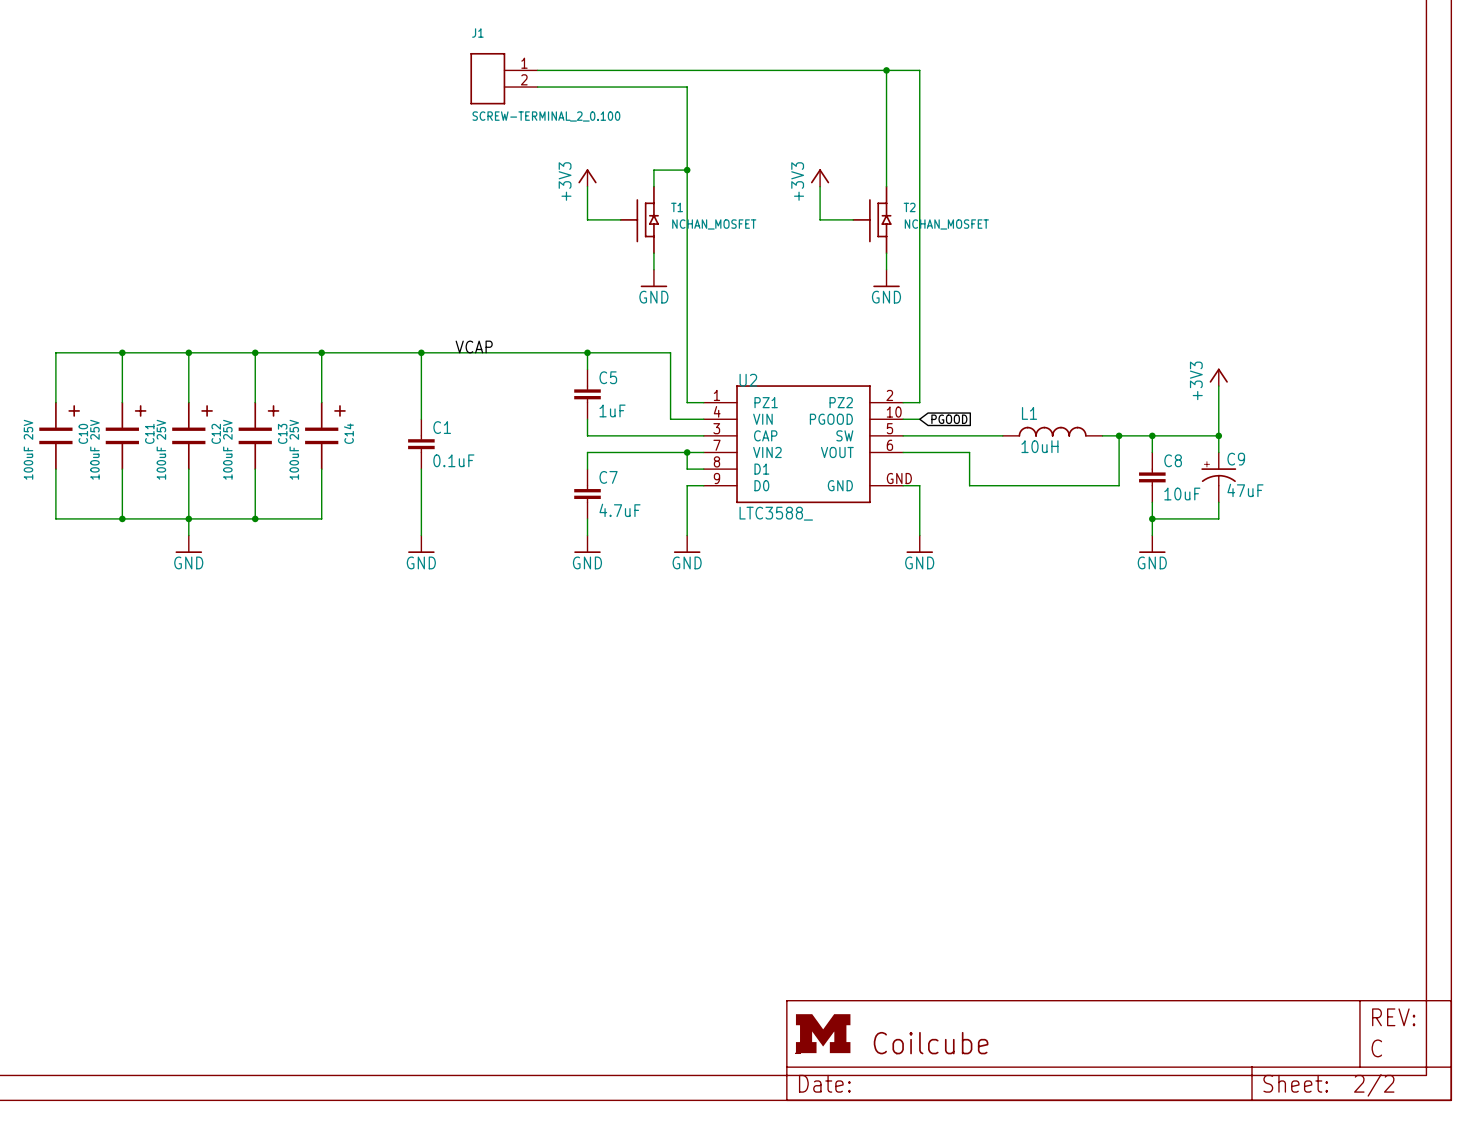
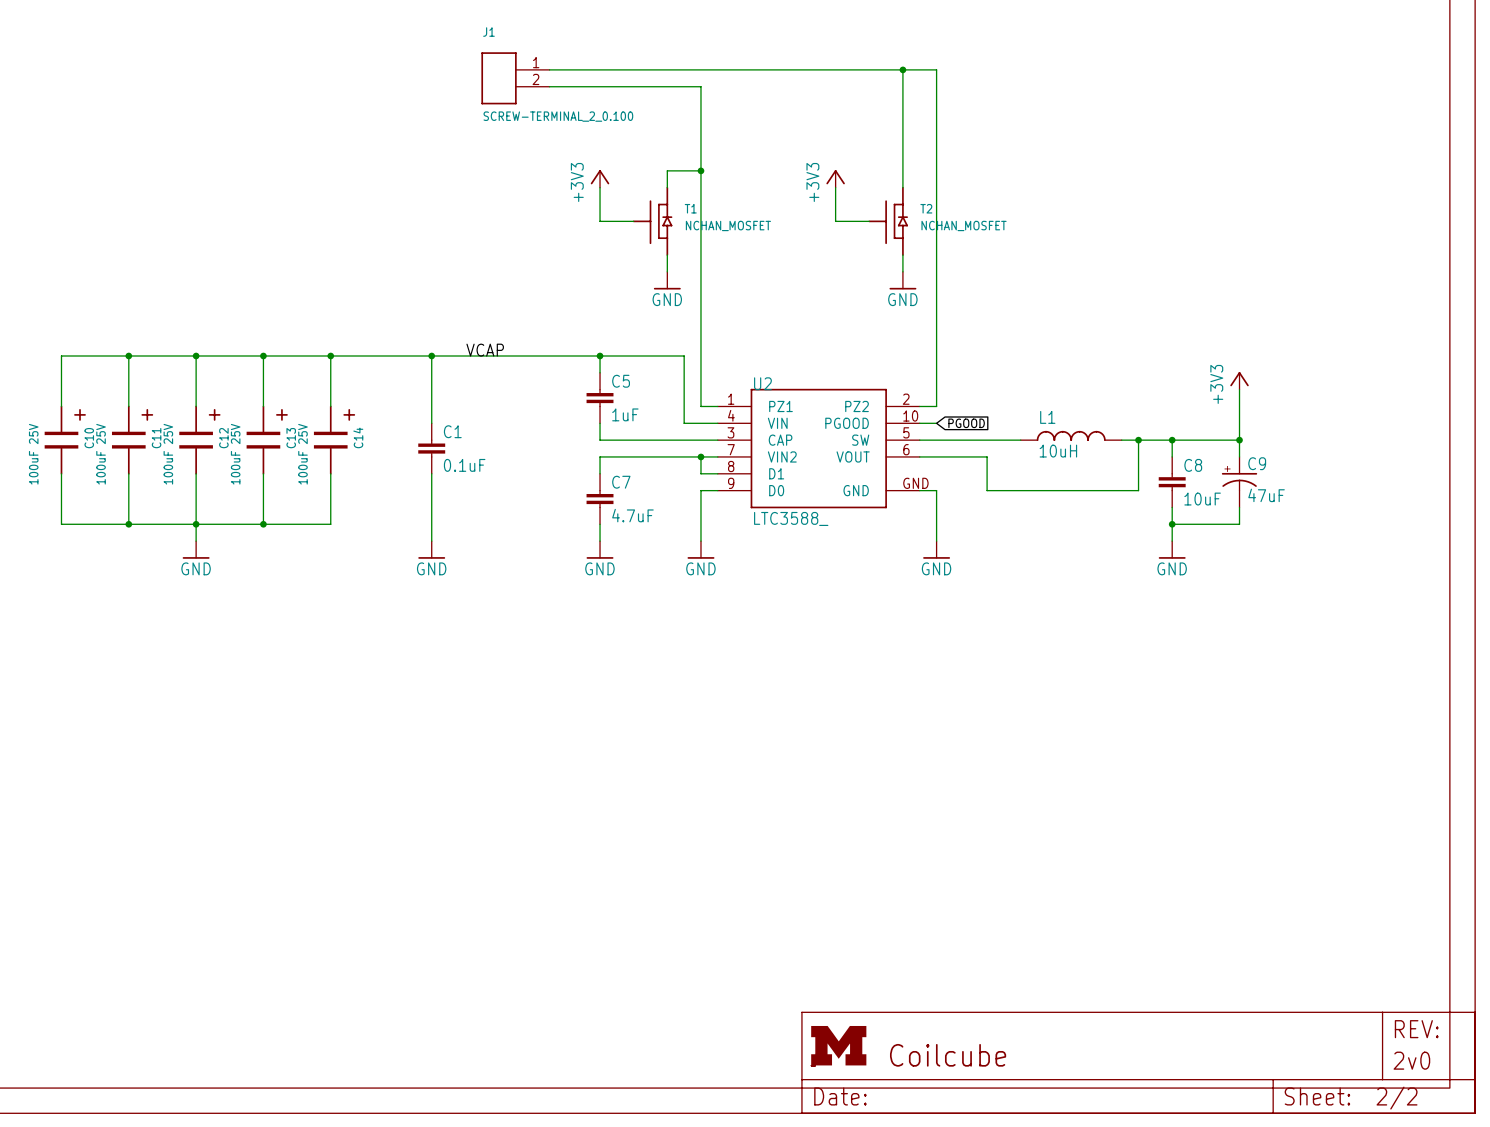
part text: C (1376, 1048) -> 2v0 (1411, 1060)

